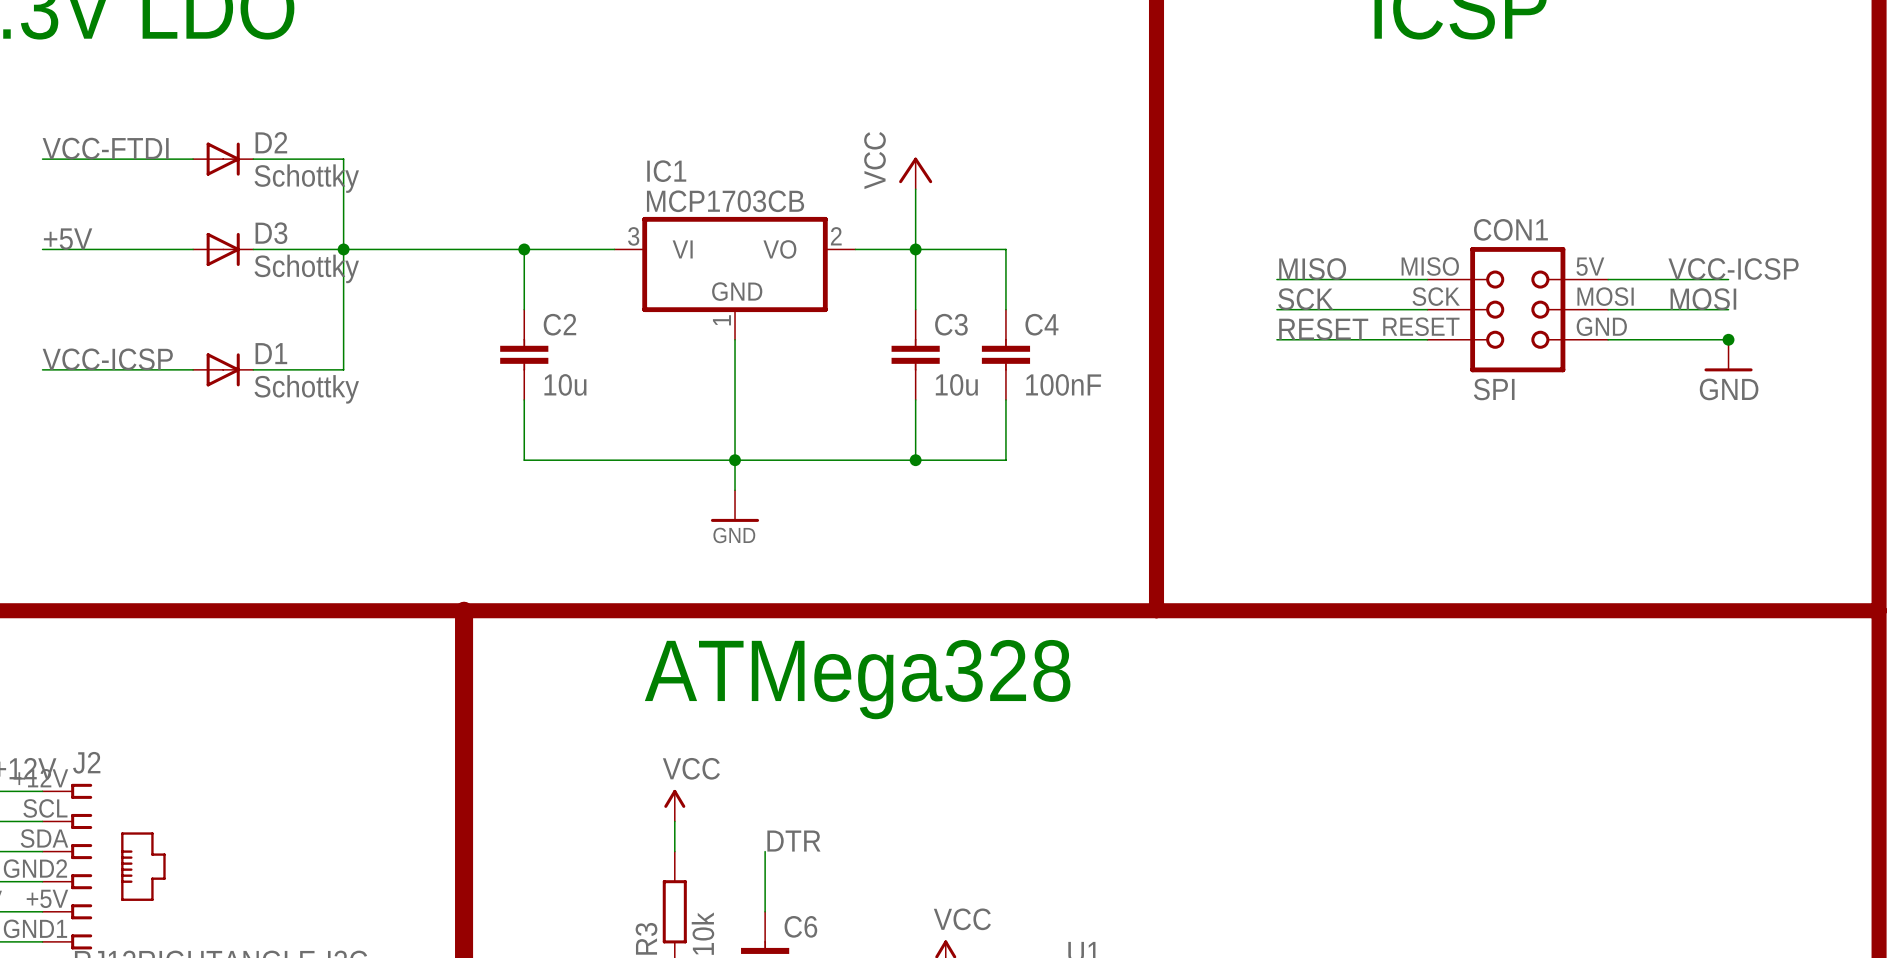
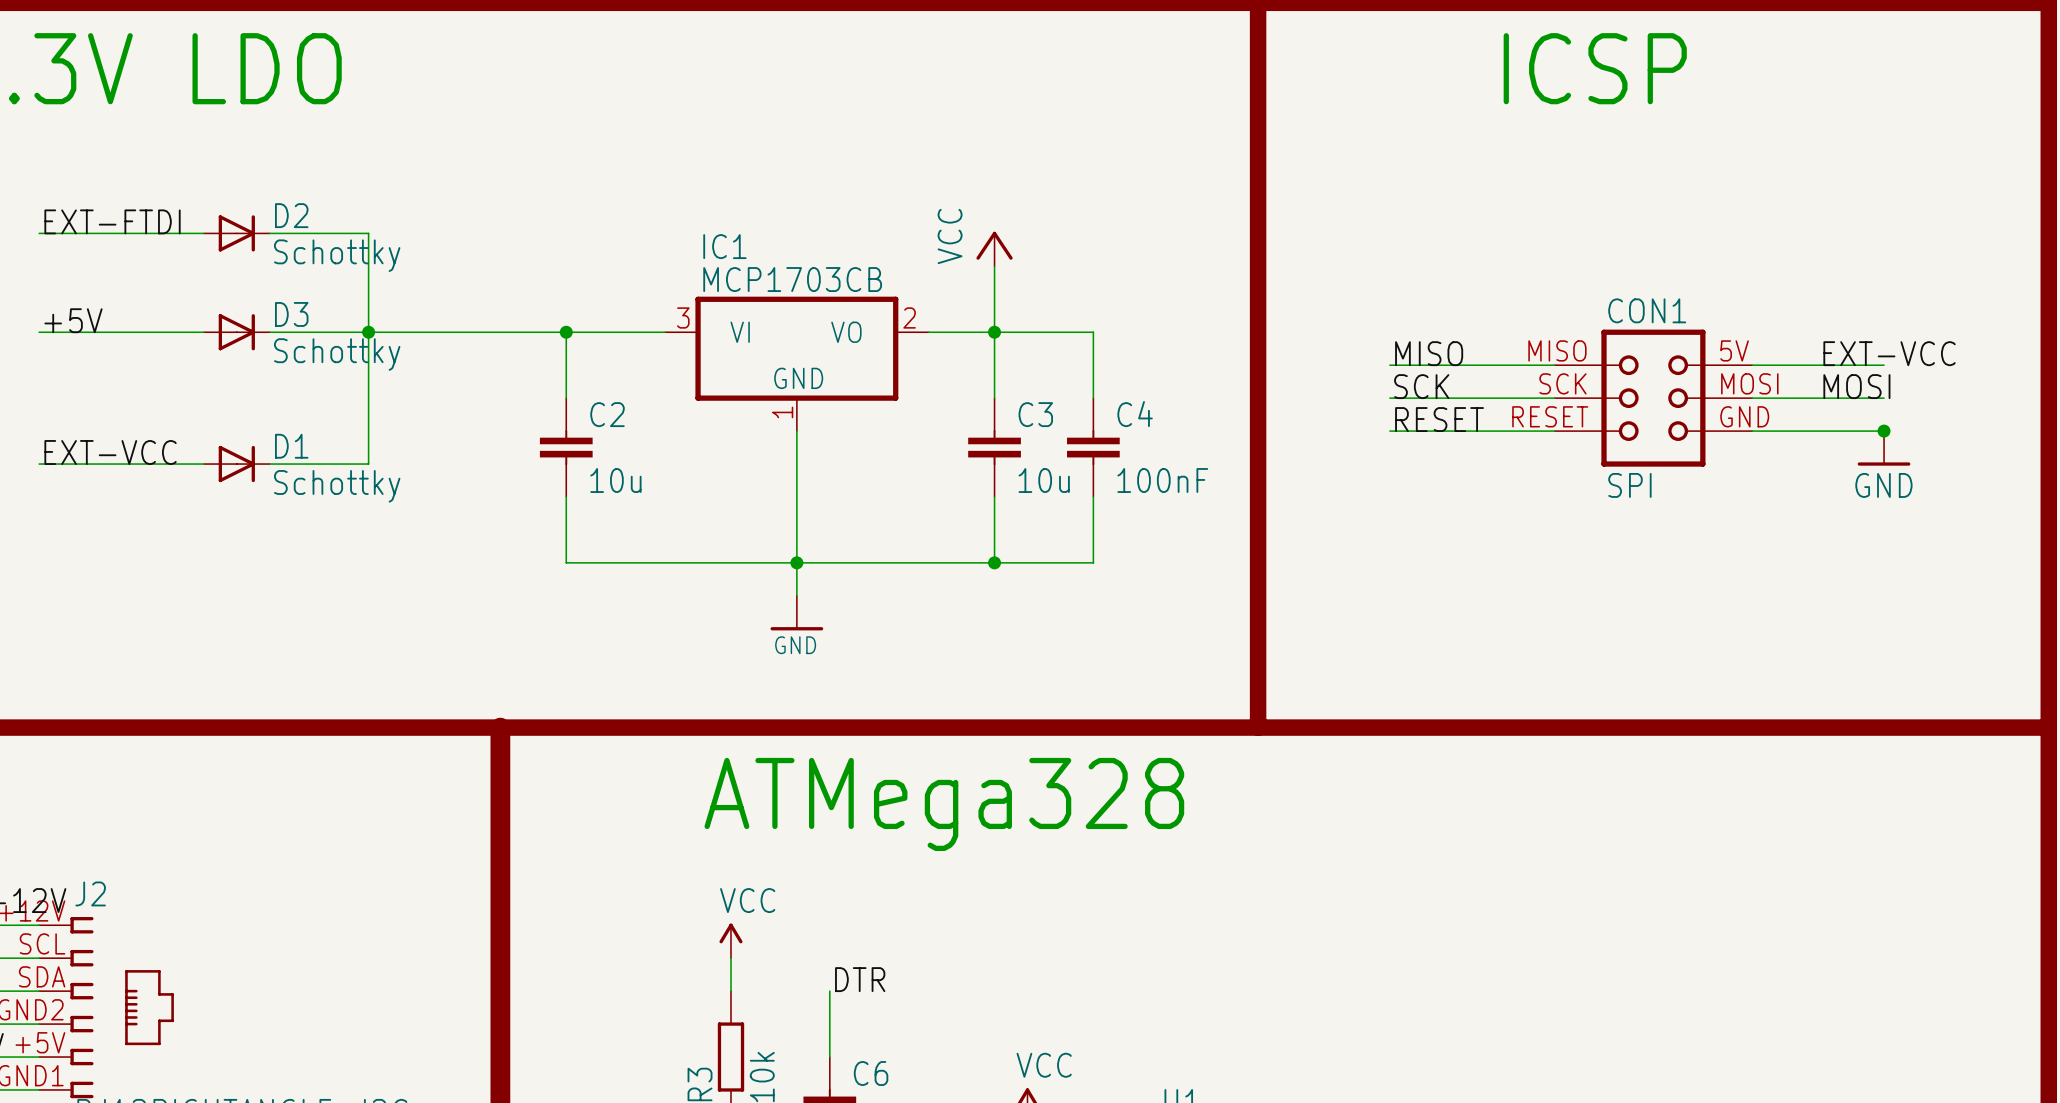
label: VCC-FTDI (105, 148) -> EXT-FTDI (112, 221)
label: VCC-ICSP (1733, 269) -> EXT-VCC (1889, 353)
label: VCC-ICSP (107, 359) -> EXT-VCC (110, 452)

